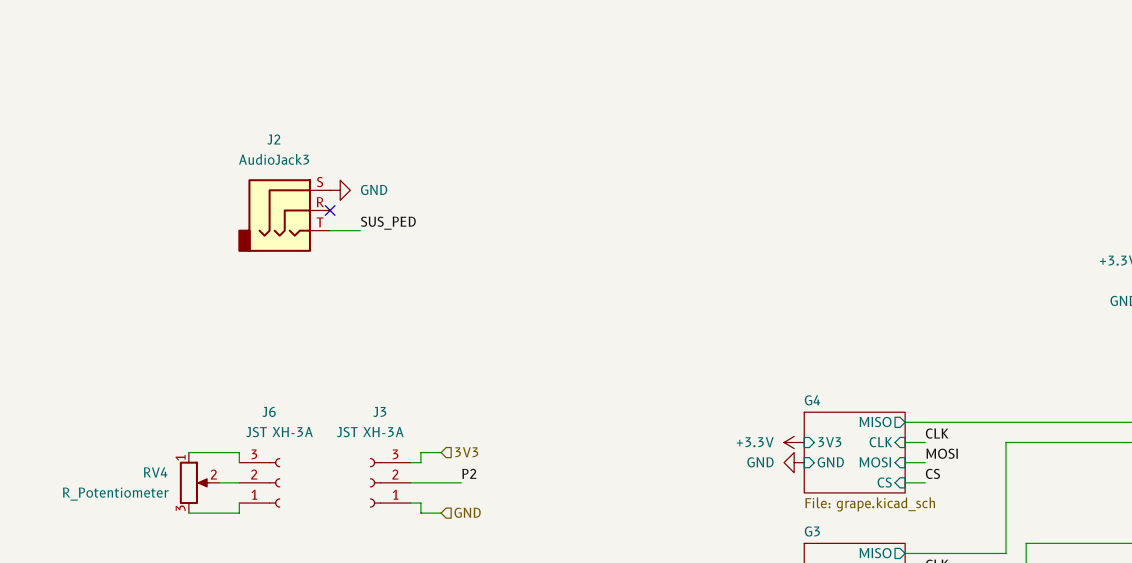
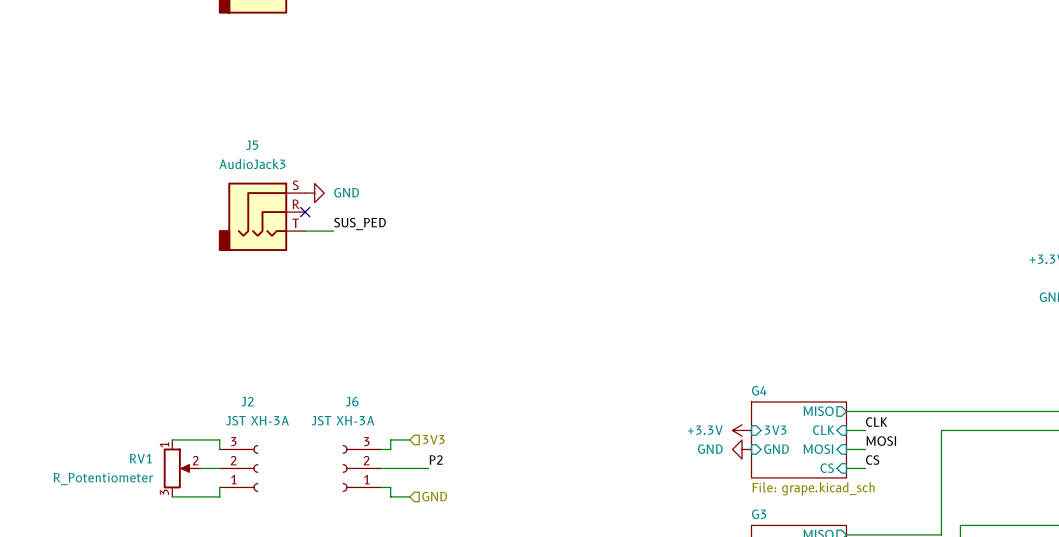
J2 name: J2 (273, 139) -> J5 (252, 145)
J6 name: J6 (269, 411) -> J2 (247, 401)
J3 name: J3 (379, 411) -> J6 (352, 401)
RV4 name: RV4 (155, 472) -> RV1 (140, 458)

